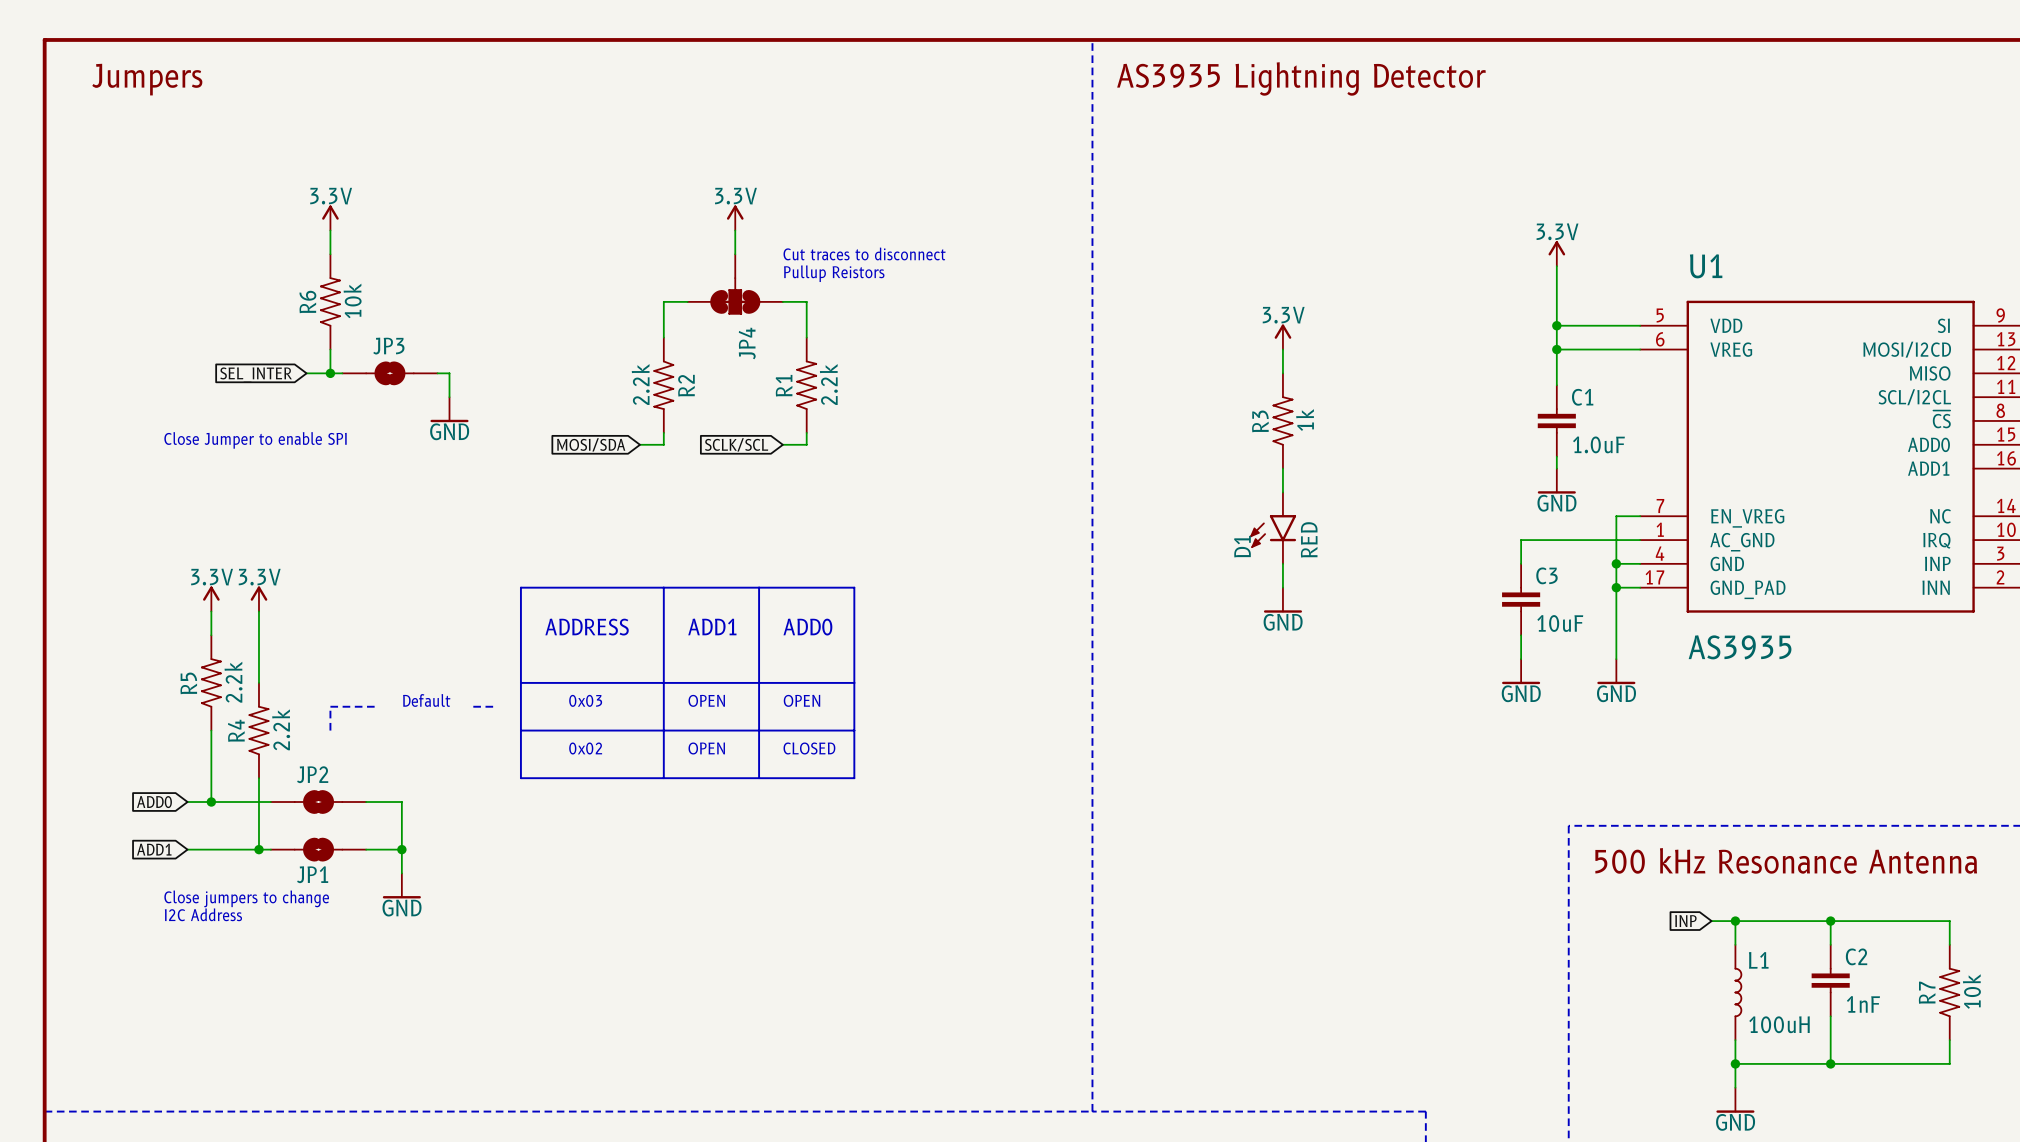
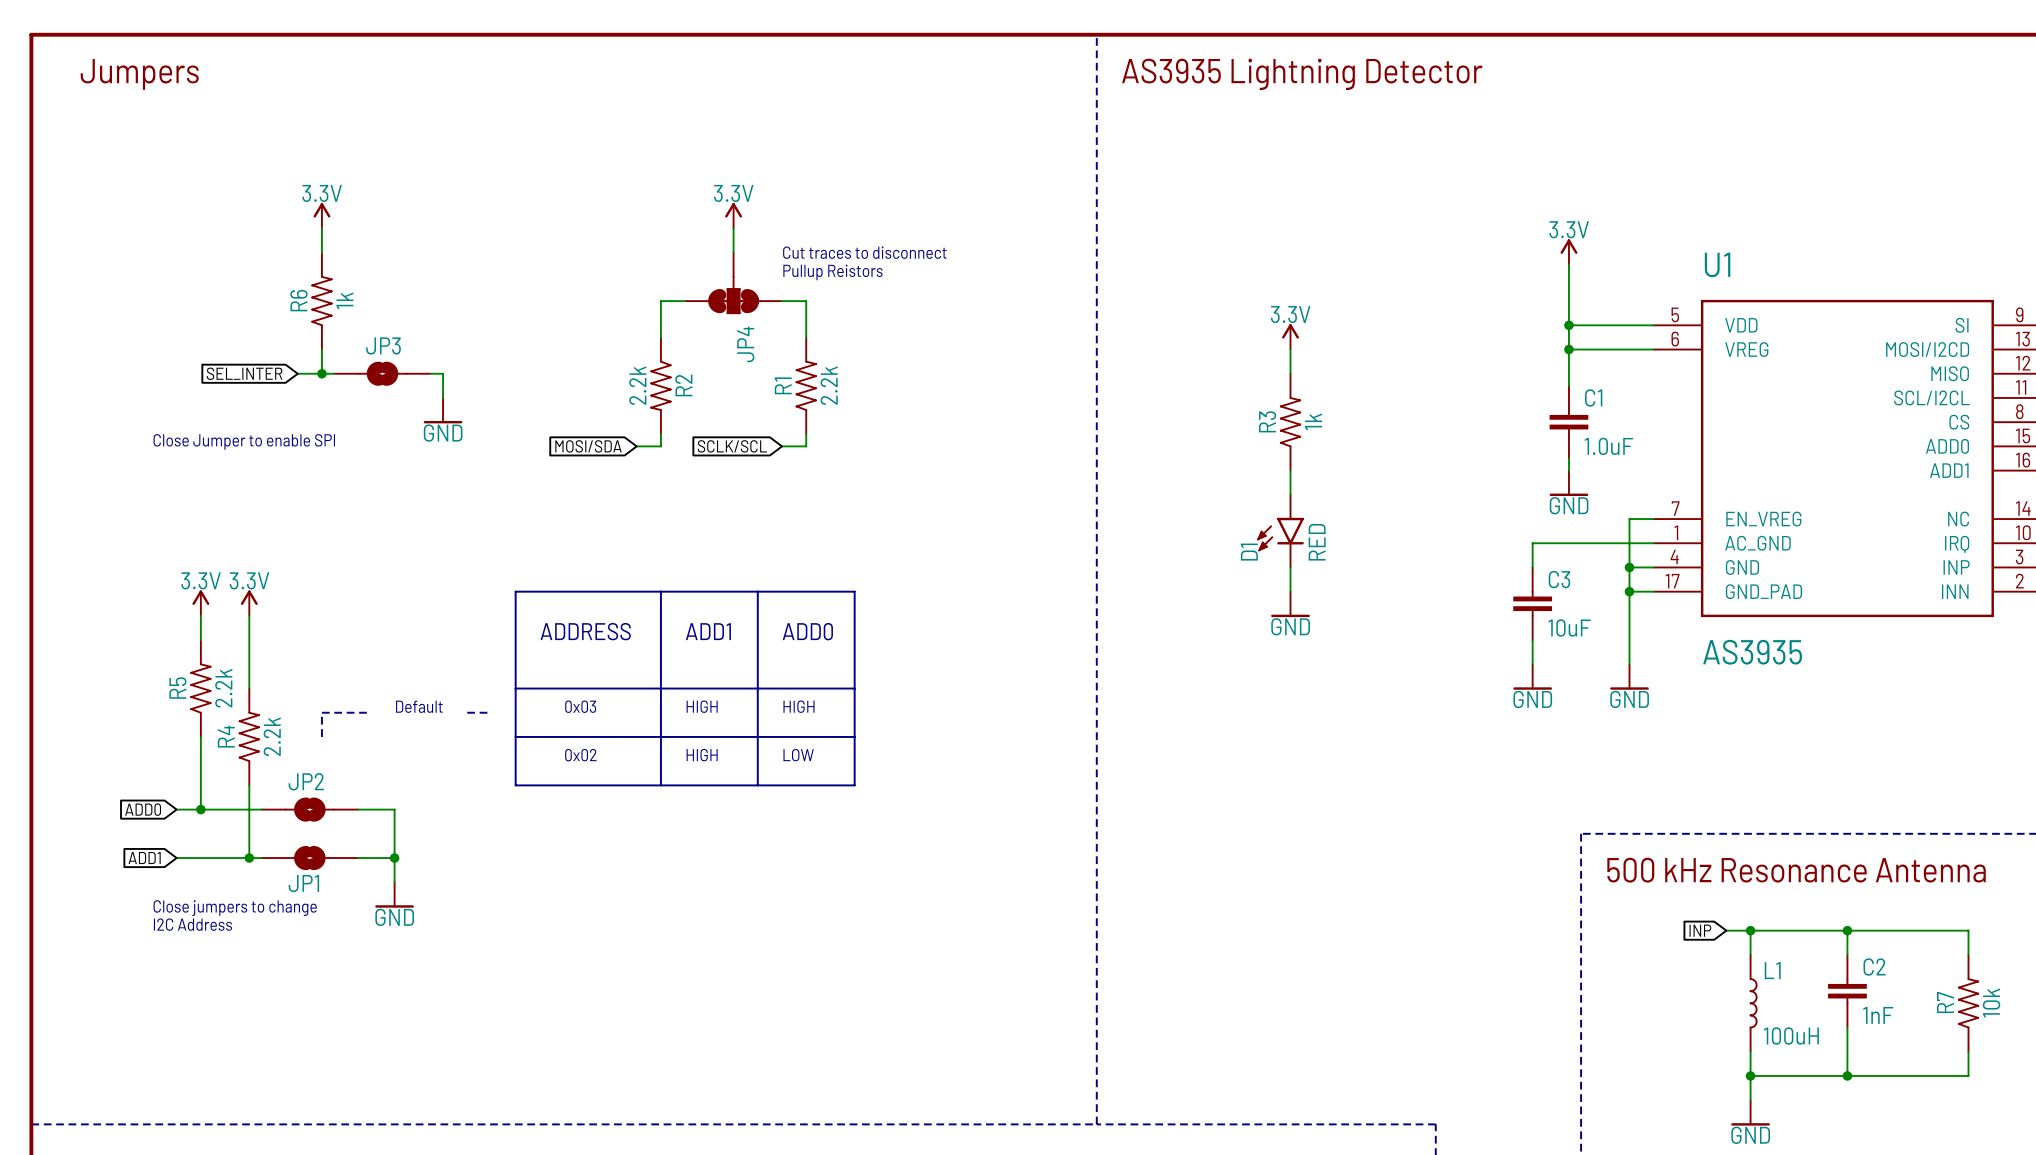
R6 value: 10k (352, 300) -> 1k (344, 300)
U1 pin name: ~{CS} (1941, 419) -> CS (1959, 422)
text: OPEN (706, 700) -> HIGH (702, 706)
text: OPEN (801, 700) -> HIGH (799, 706)
text: OPEN (706, 748) -> HIGH (702, 755)
text: CLOSED (809, 748) -> LOW (798, 755)

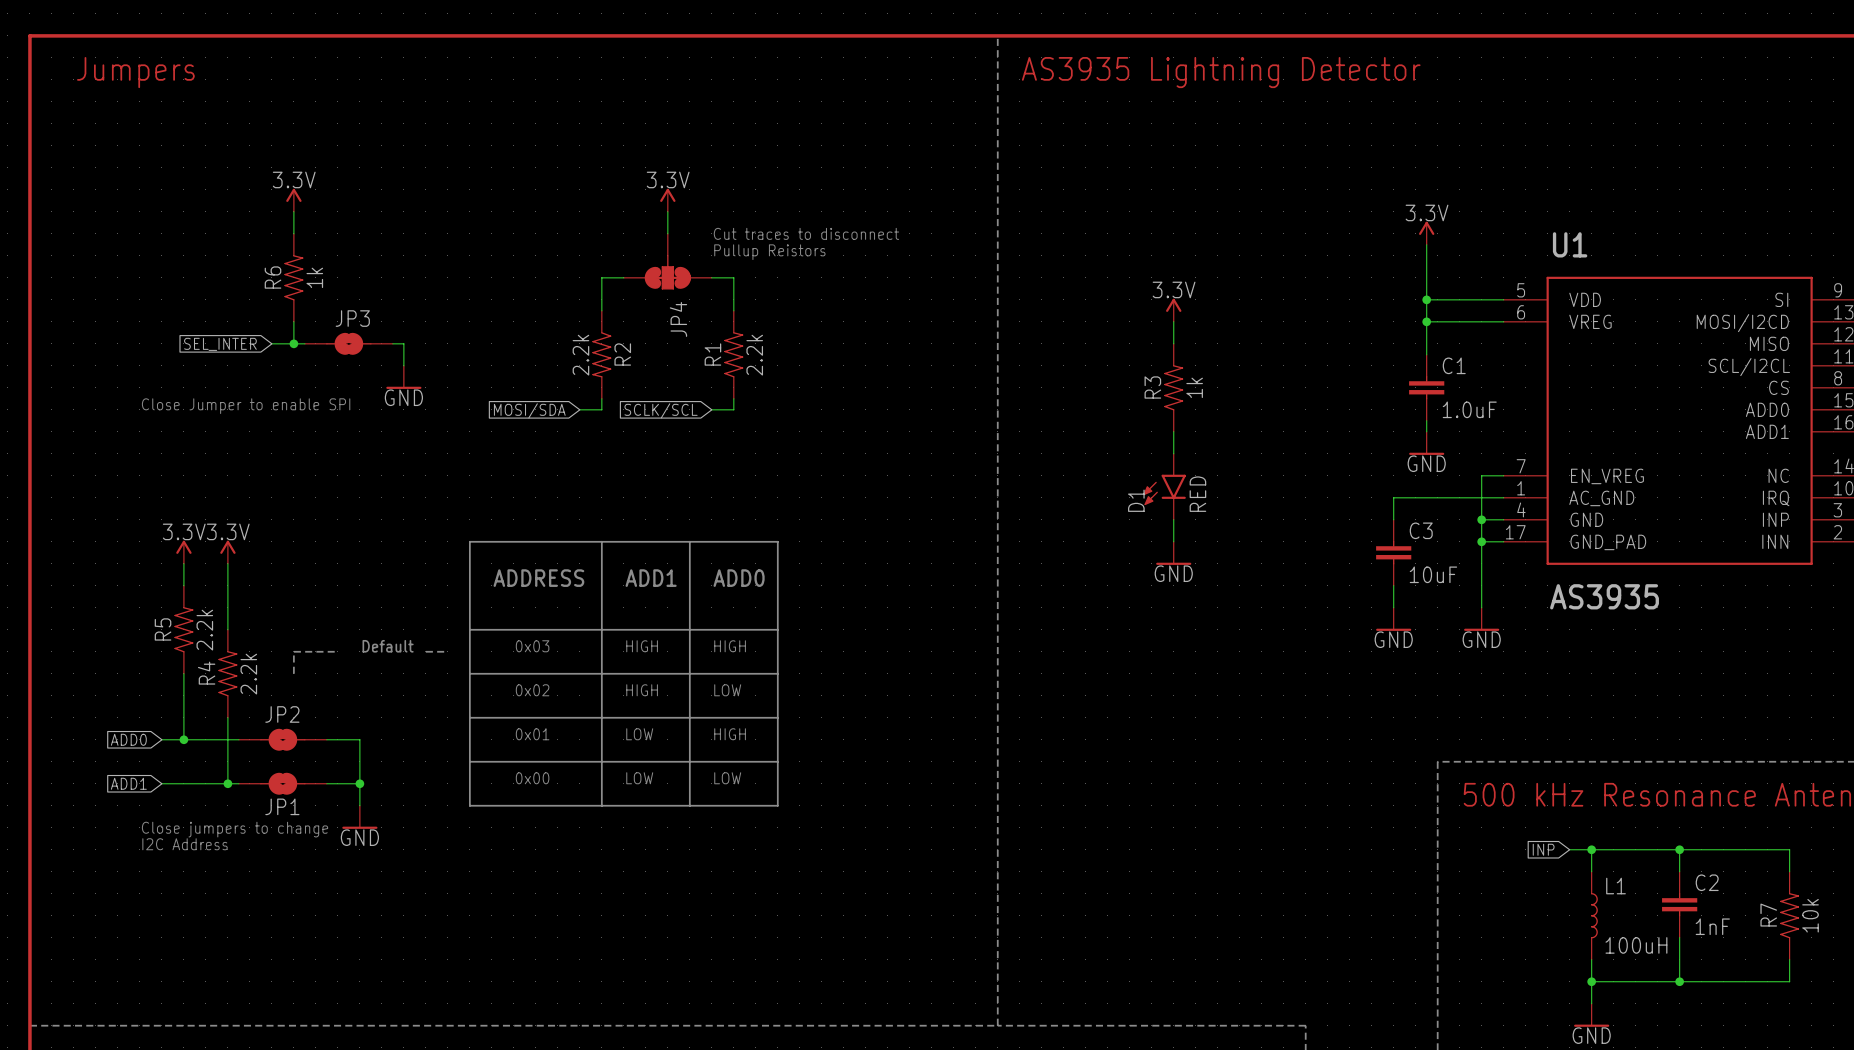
line: none -> (469, 717) (469, 805) (777, 805) (777, 717)
line: none -> (601, 717) (601, 805)
line: none -> (689, 717) (689, 805)
text: none -> 0x01 (532, 734)
text: none -> LOW (639, 734)
text: none -> HIGH (730, 734)
line: none -> (469, 761) (777, 761)
text: none -> 0x00 (532, 778)
text: none -> LOW (639, 778)
text: none -> LOW (727, 778)

